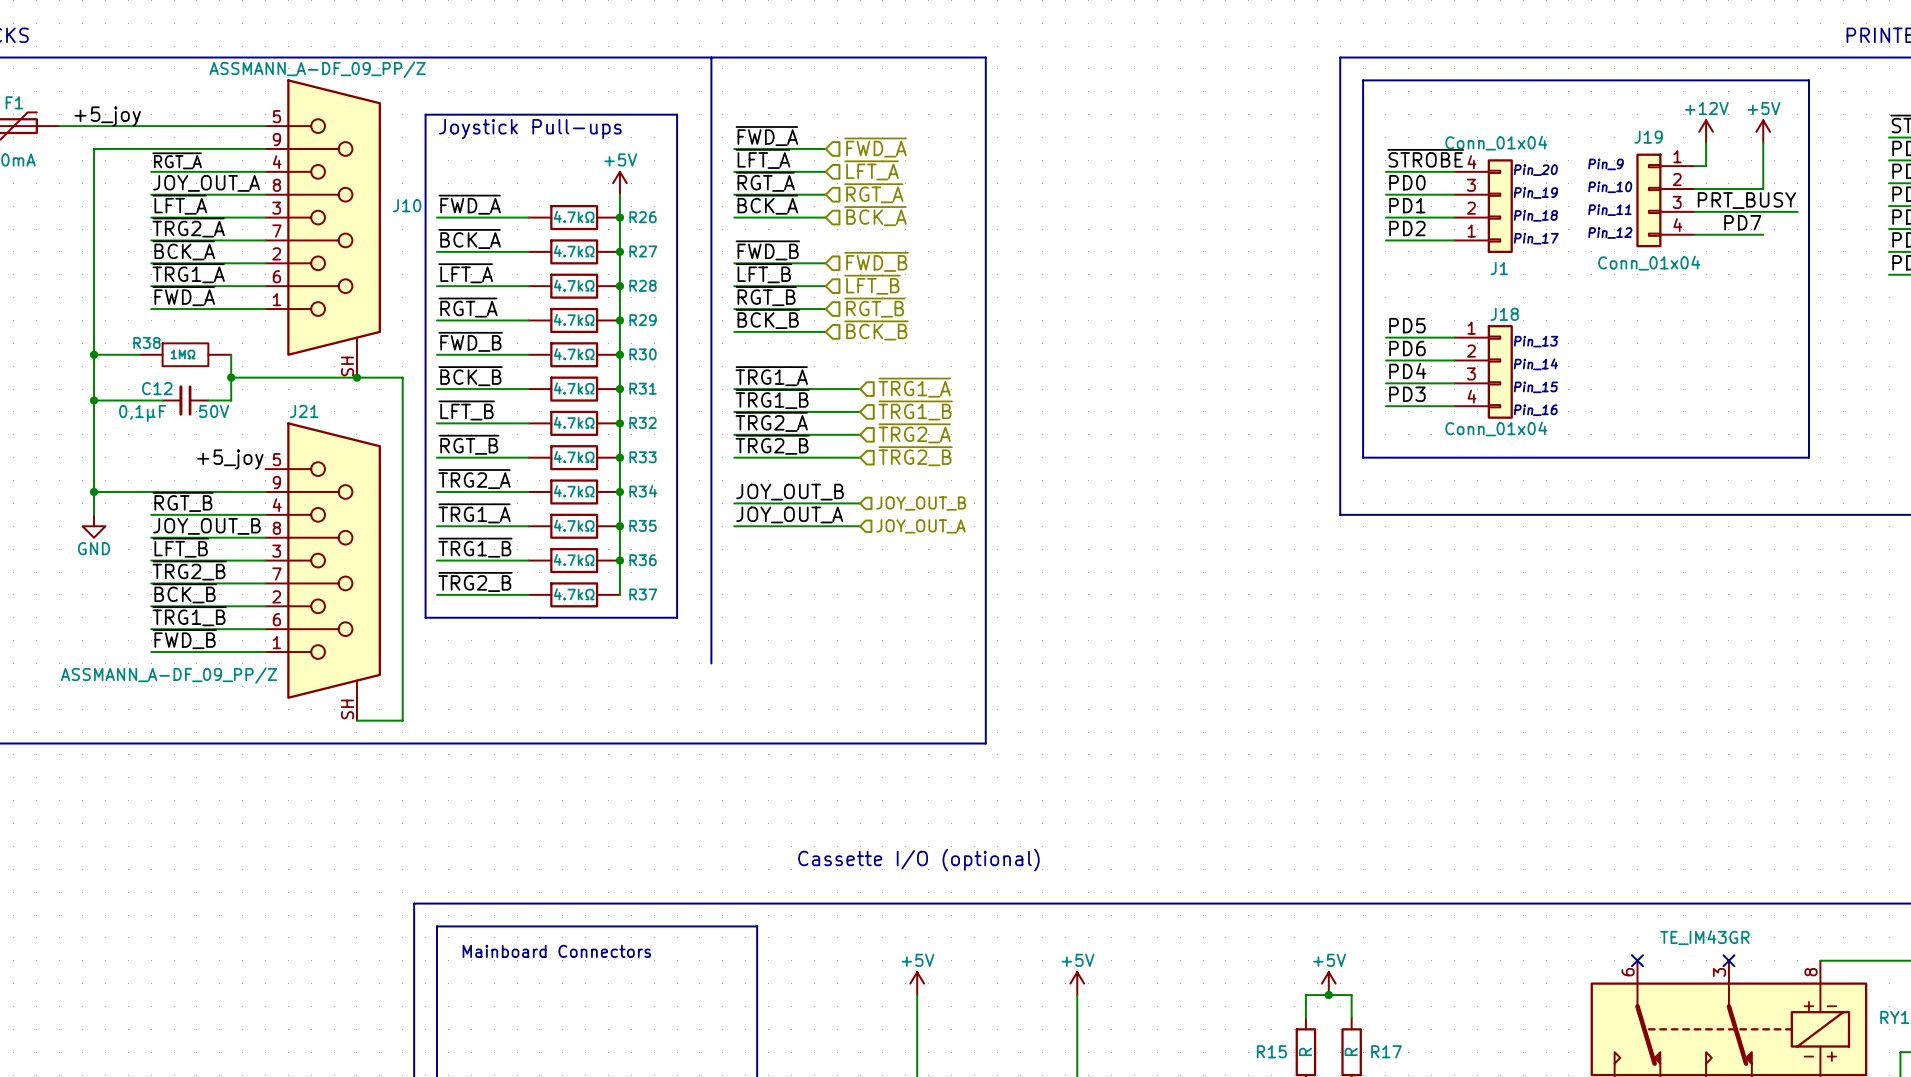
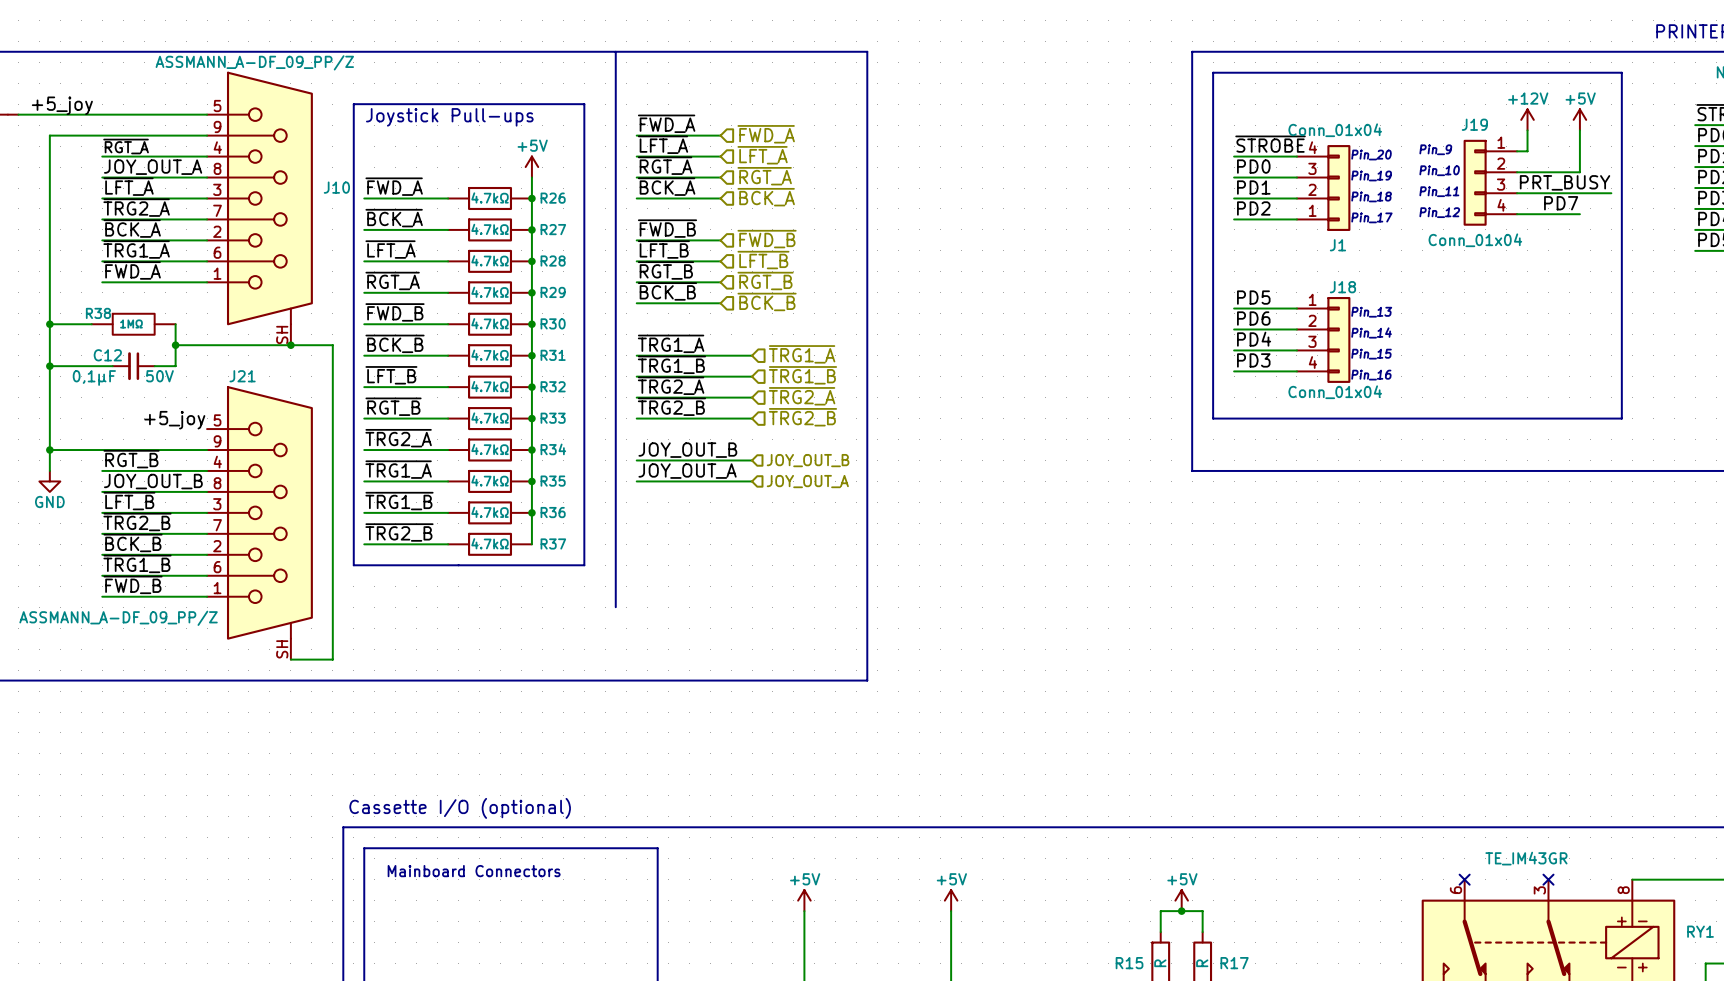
text: Cassette I/O (optional) (918, 860) -> none
text: none -> Cassette I/O (optional) (460, 808)

